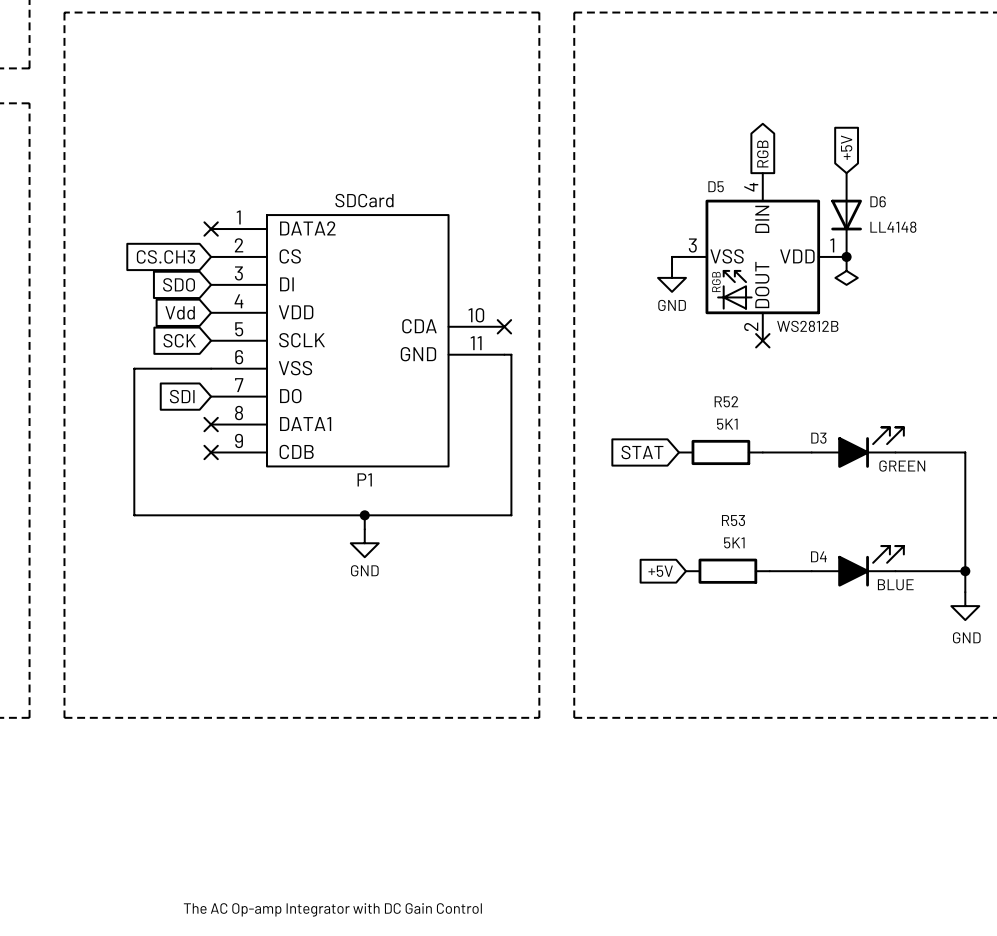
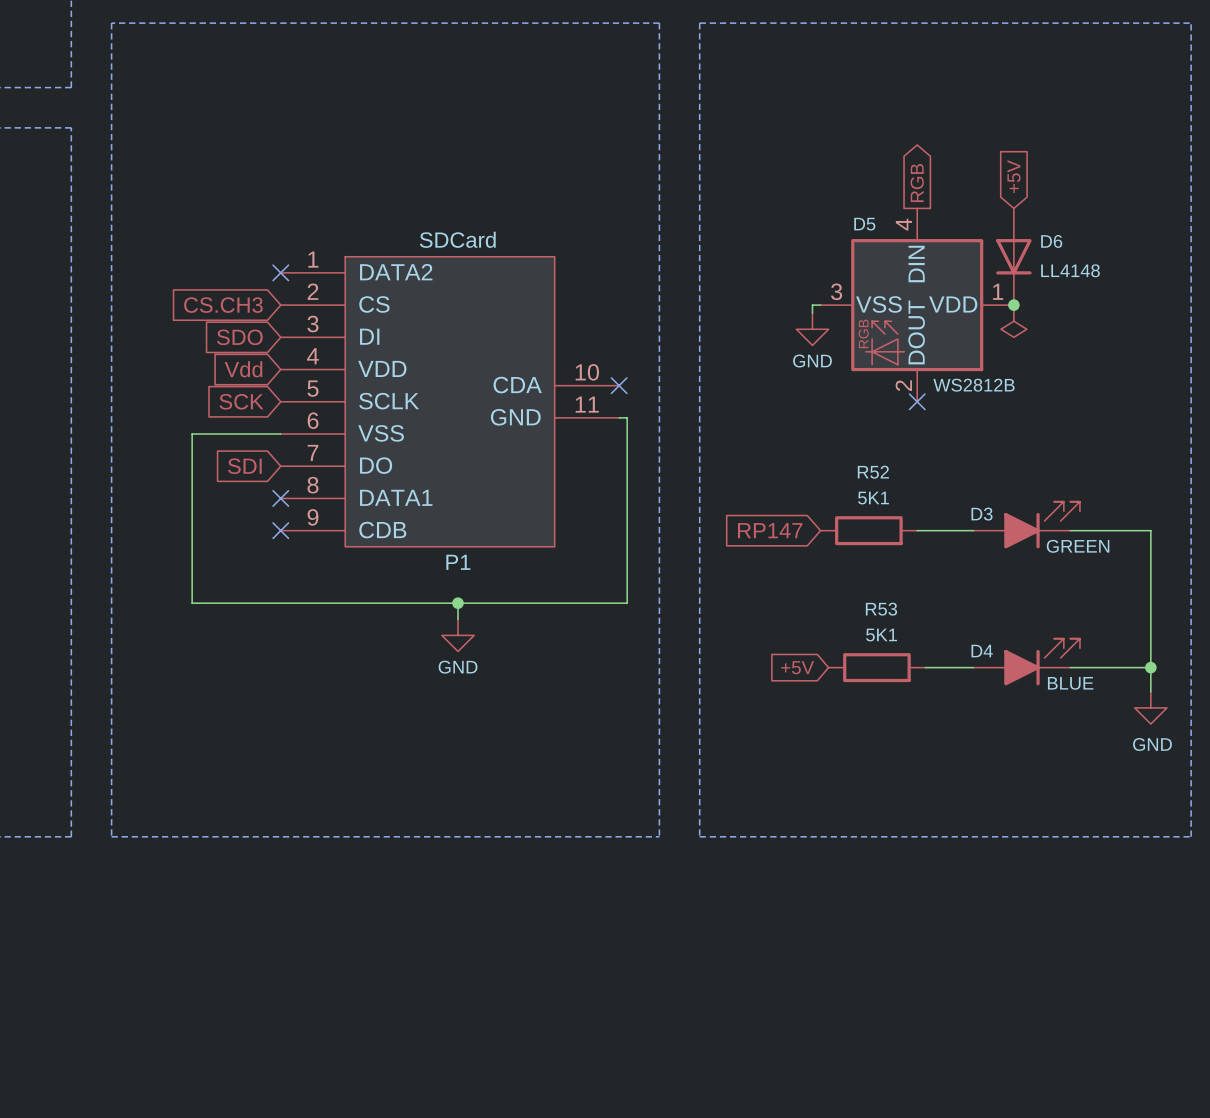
global label: STAT (642, 452) -> RP147 (770, 530)
text: The AC Op-amp Integrator with DC Gain Control (332, 909) -> none

